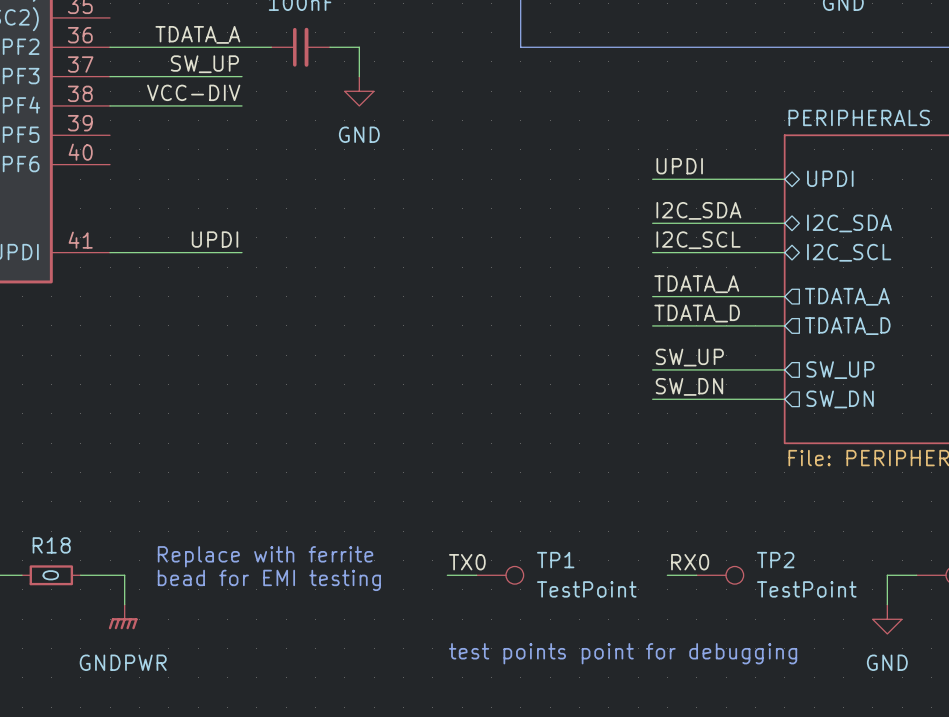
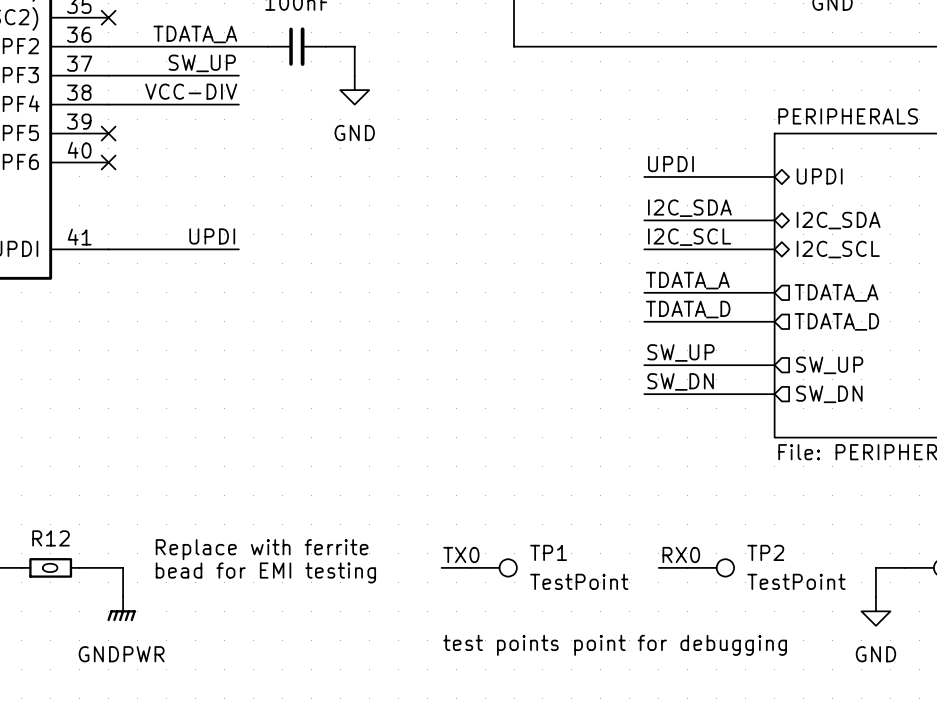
no-connect mark: none -> (108, 17)
no-connect mark: none -> (108, 133)
no-connect mark: none -> (108, 162)
R18 name: R18 (51, 545) -> R12 (51, 538)

